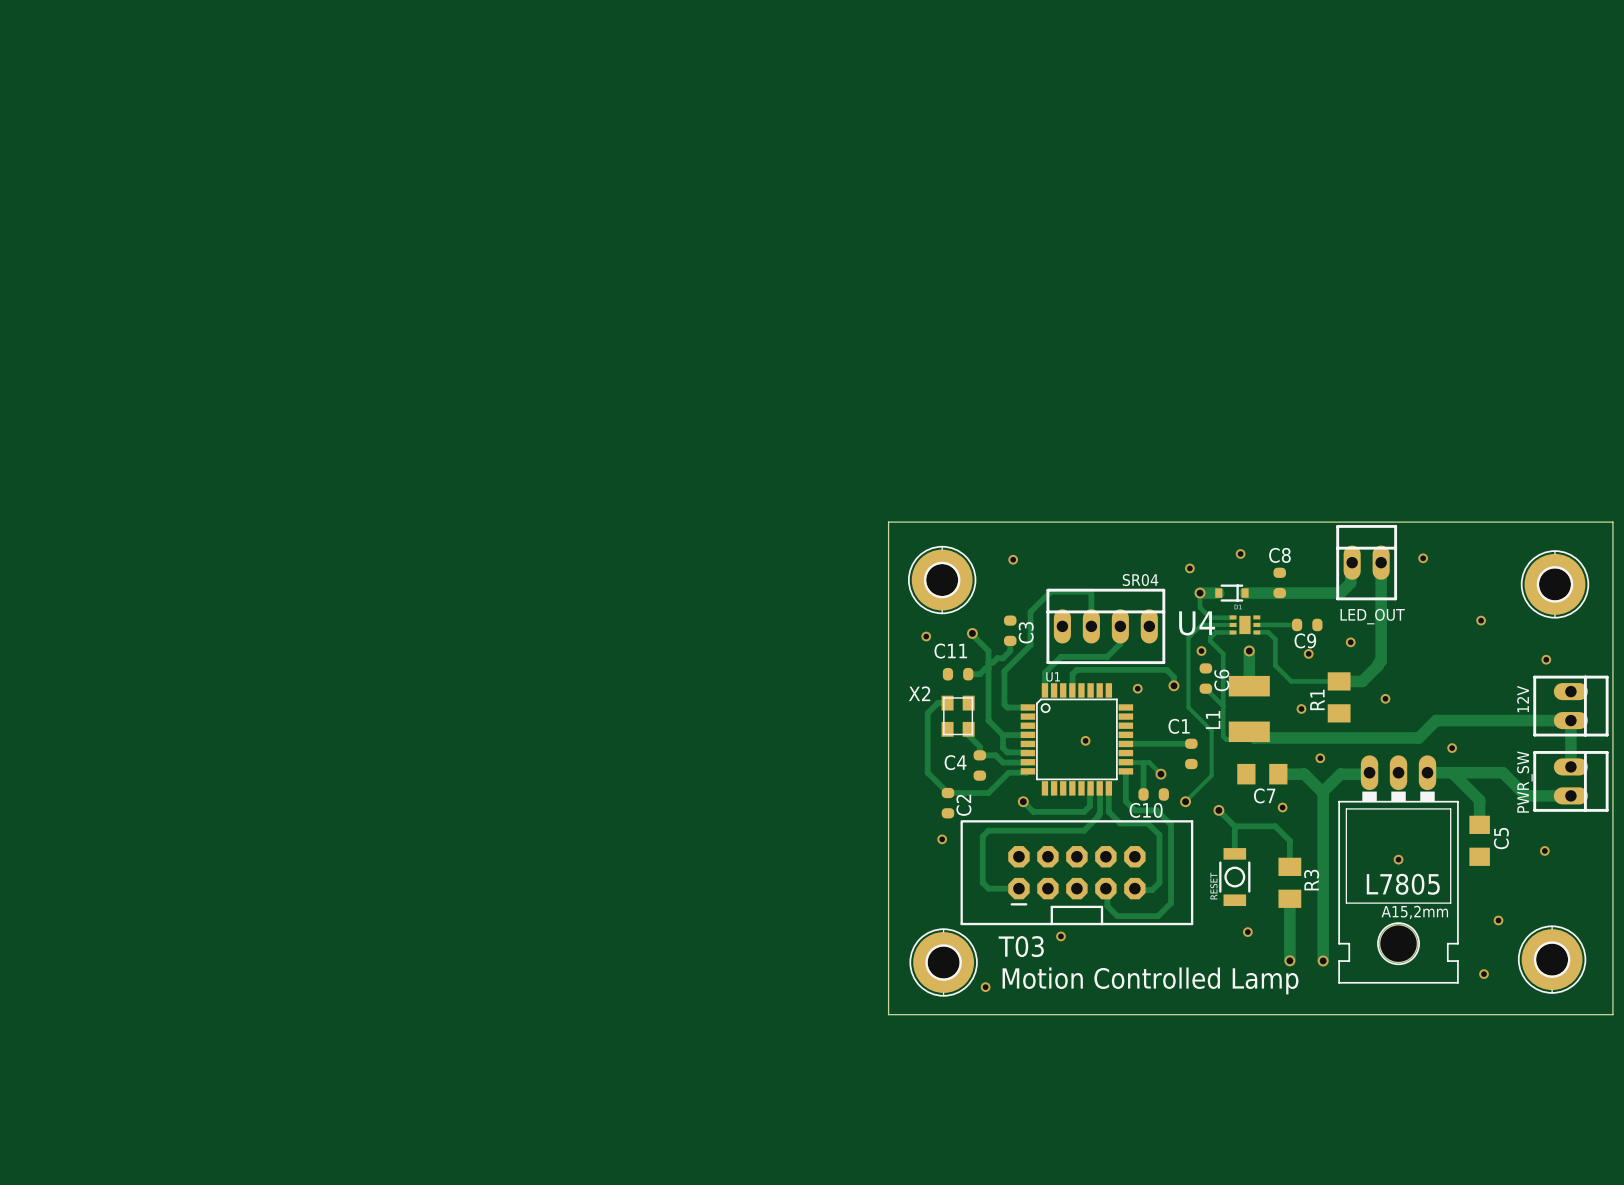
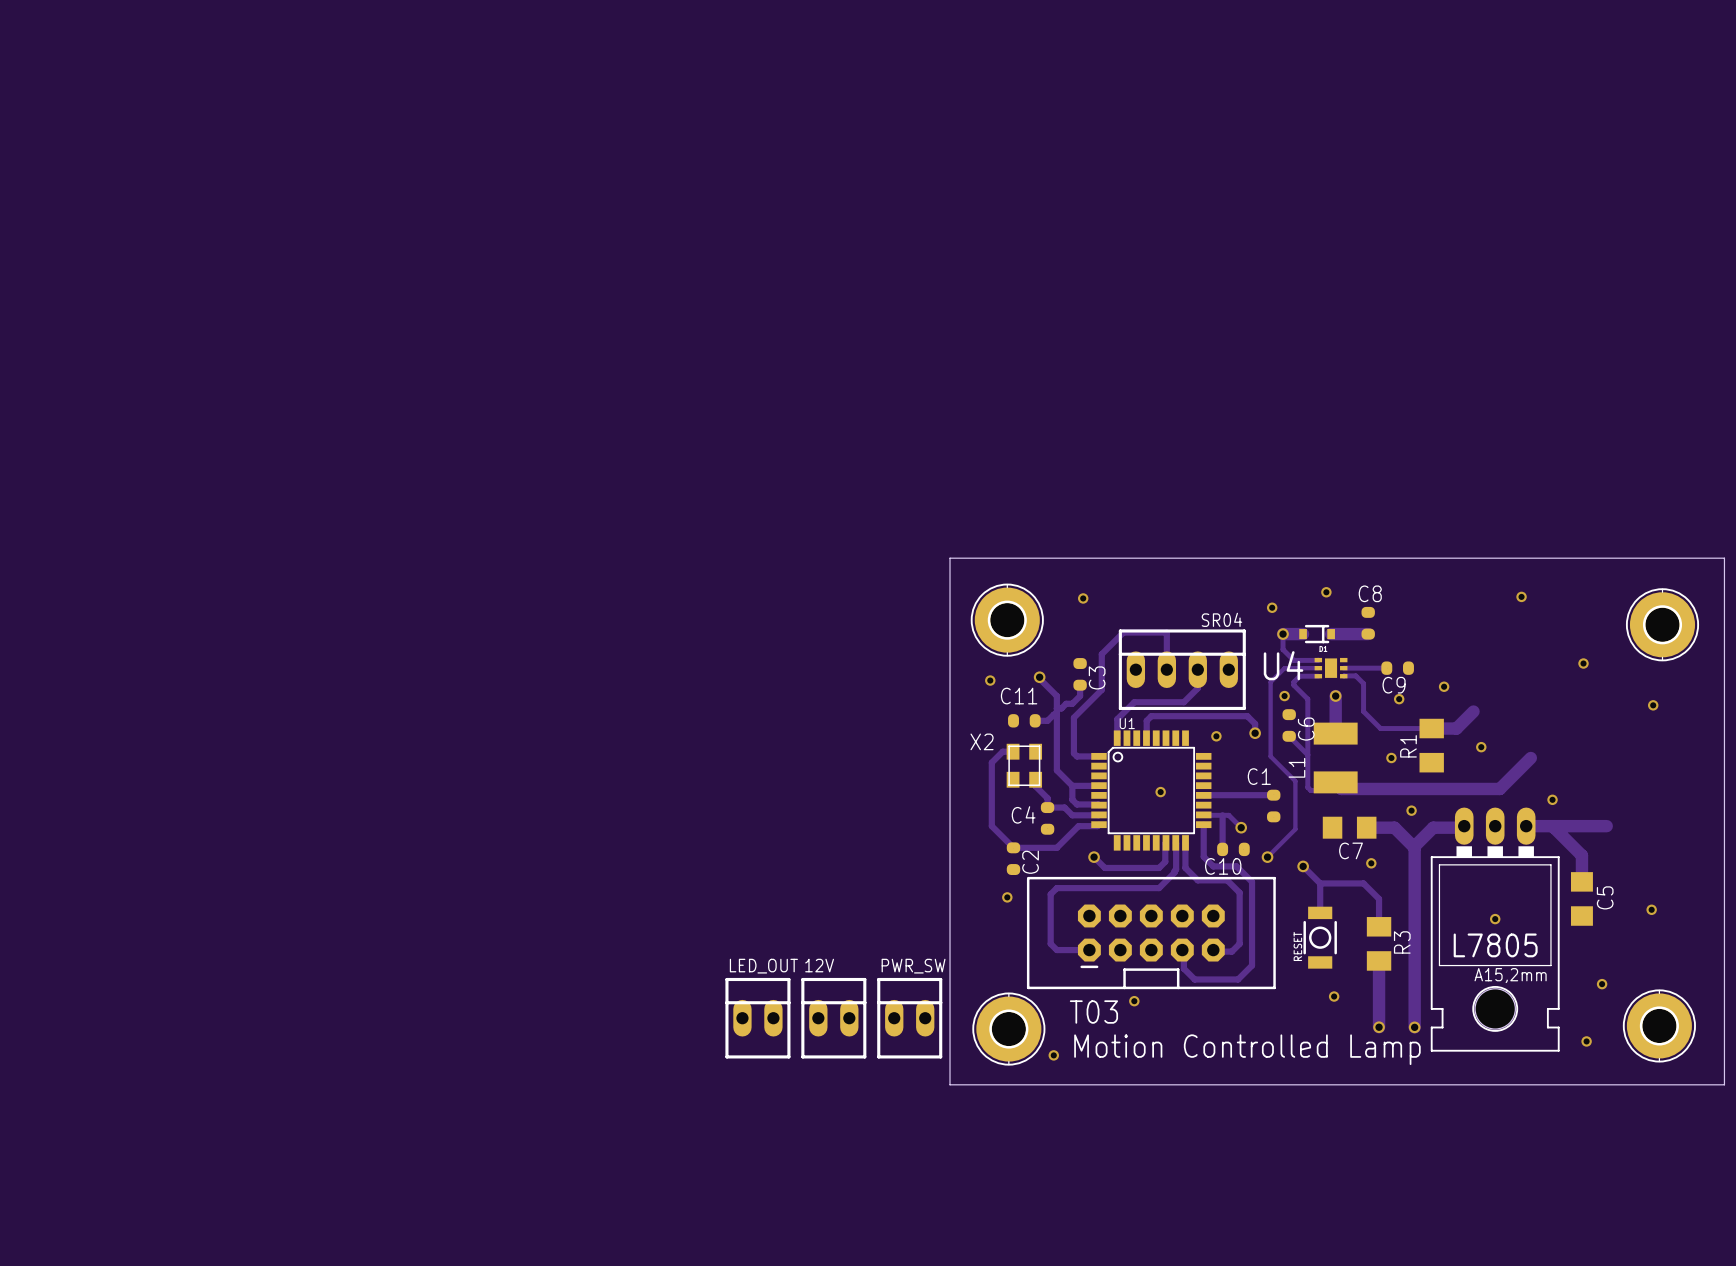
track: (1352, 562) (1350, 582) (1340, 593) (1279, 593) -> none
LED_OUT: (1366, 562) -> none
track: (1381, 562) (1381, 661) (1378, 665) -> none
12V name position: 12V (1523, 699) -> 12V (819, 965)
12V rotation: 0° (1570, 706) -> 90° counterclockwise (833, 1018)
12V position: (1570, 706) -> (833, 1018)
track: (1402, 737) (1418, 737) (1436, 720) (1570, 720) (1570, 766) -> (1499, 788) (1530, 757)
track: (1502, 772) (1526, 795) (1570, 795) -> none
PWR_SW: (1570, 781) -> none
LED_OUT: none -> (757, 1018)
PWR_SW: none -> (909, 1018)

